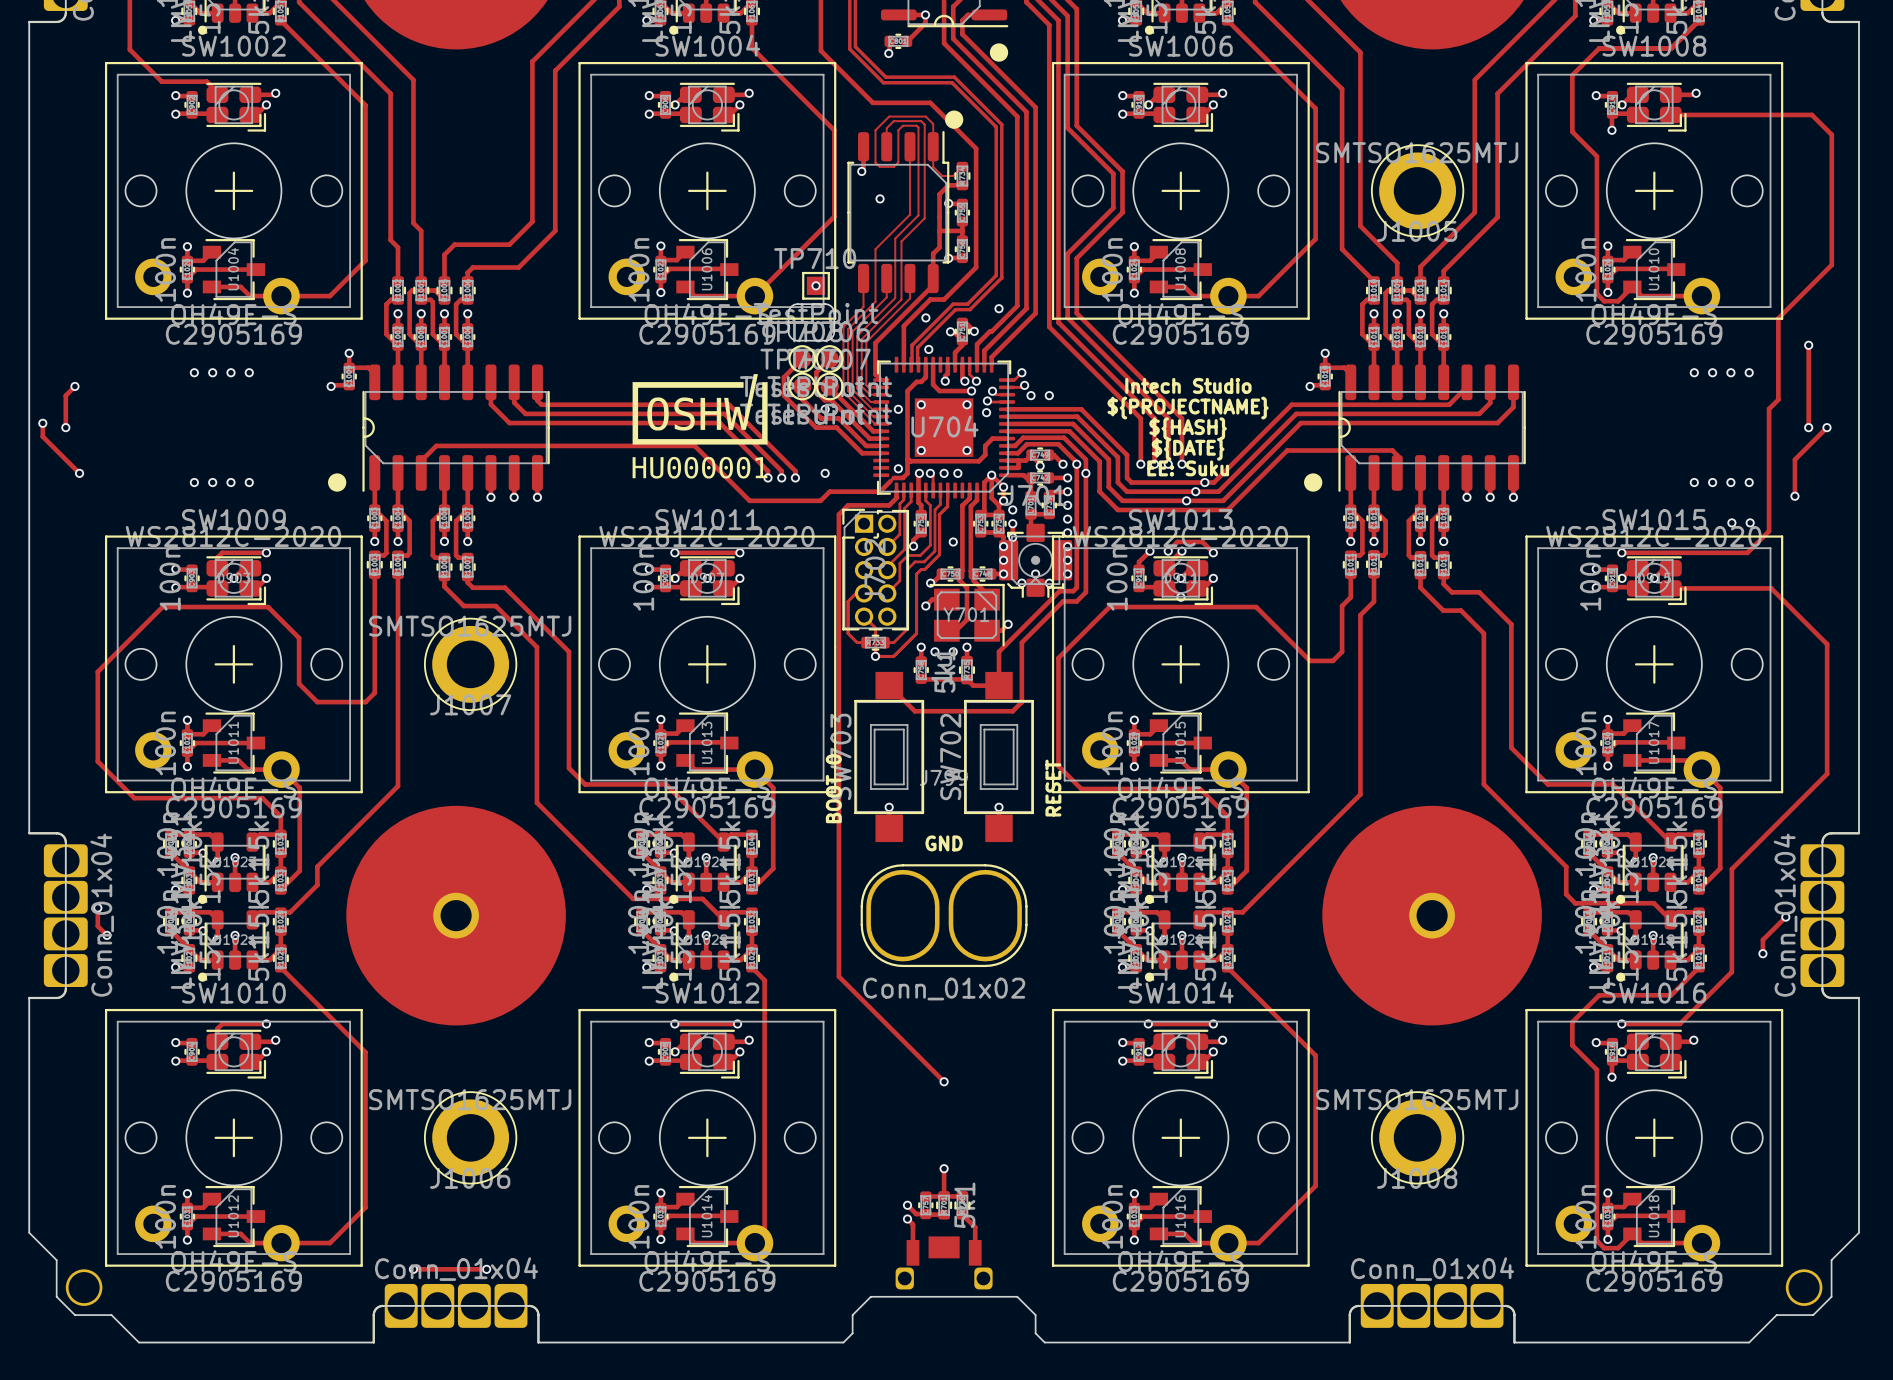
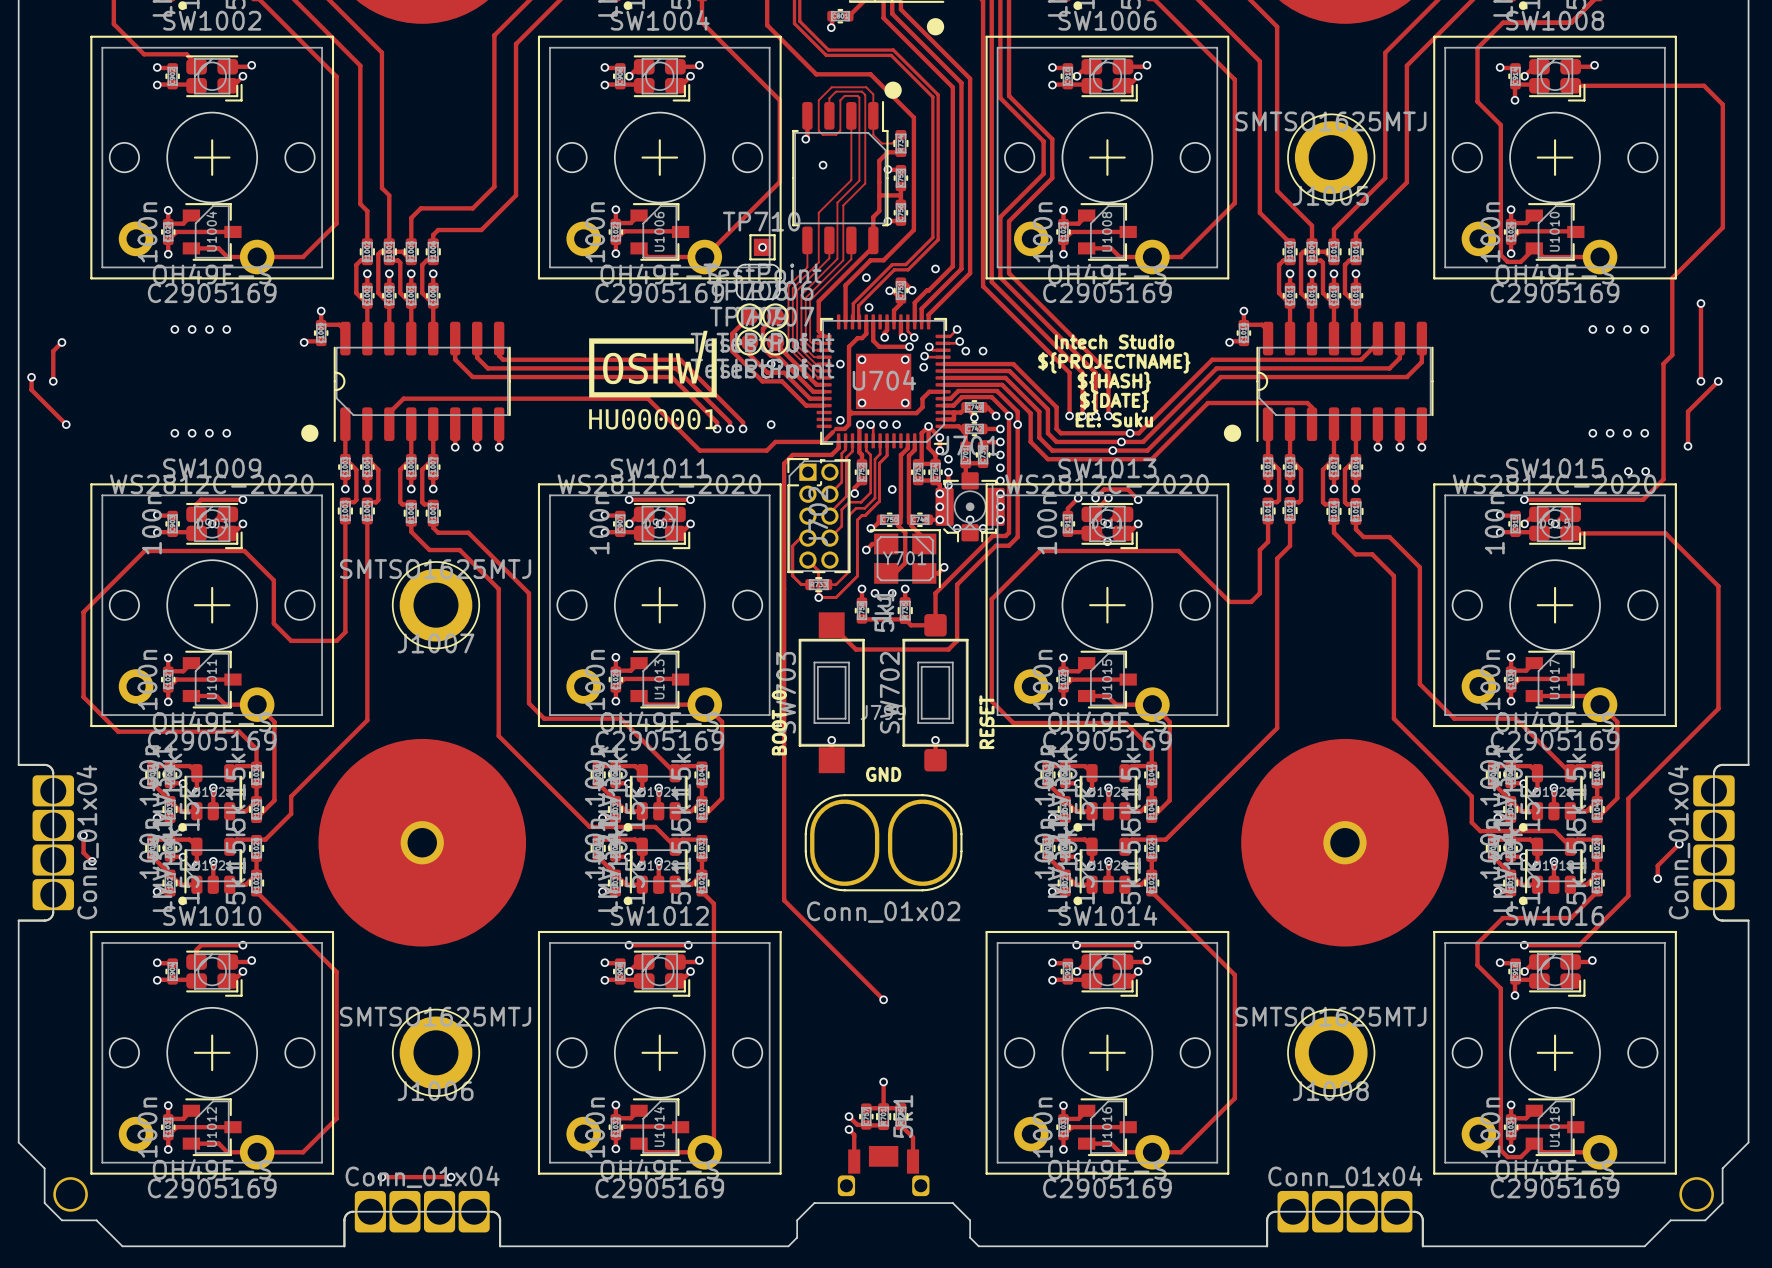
SW702 footprint: [964, 671, 1034, 843] -> [902, 614, 969, 772]

